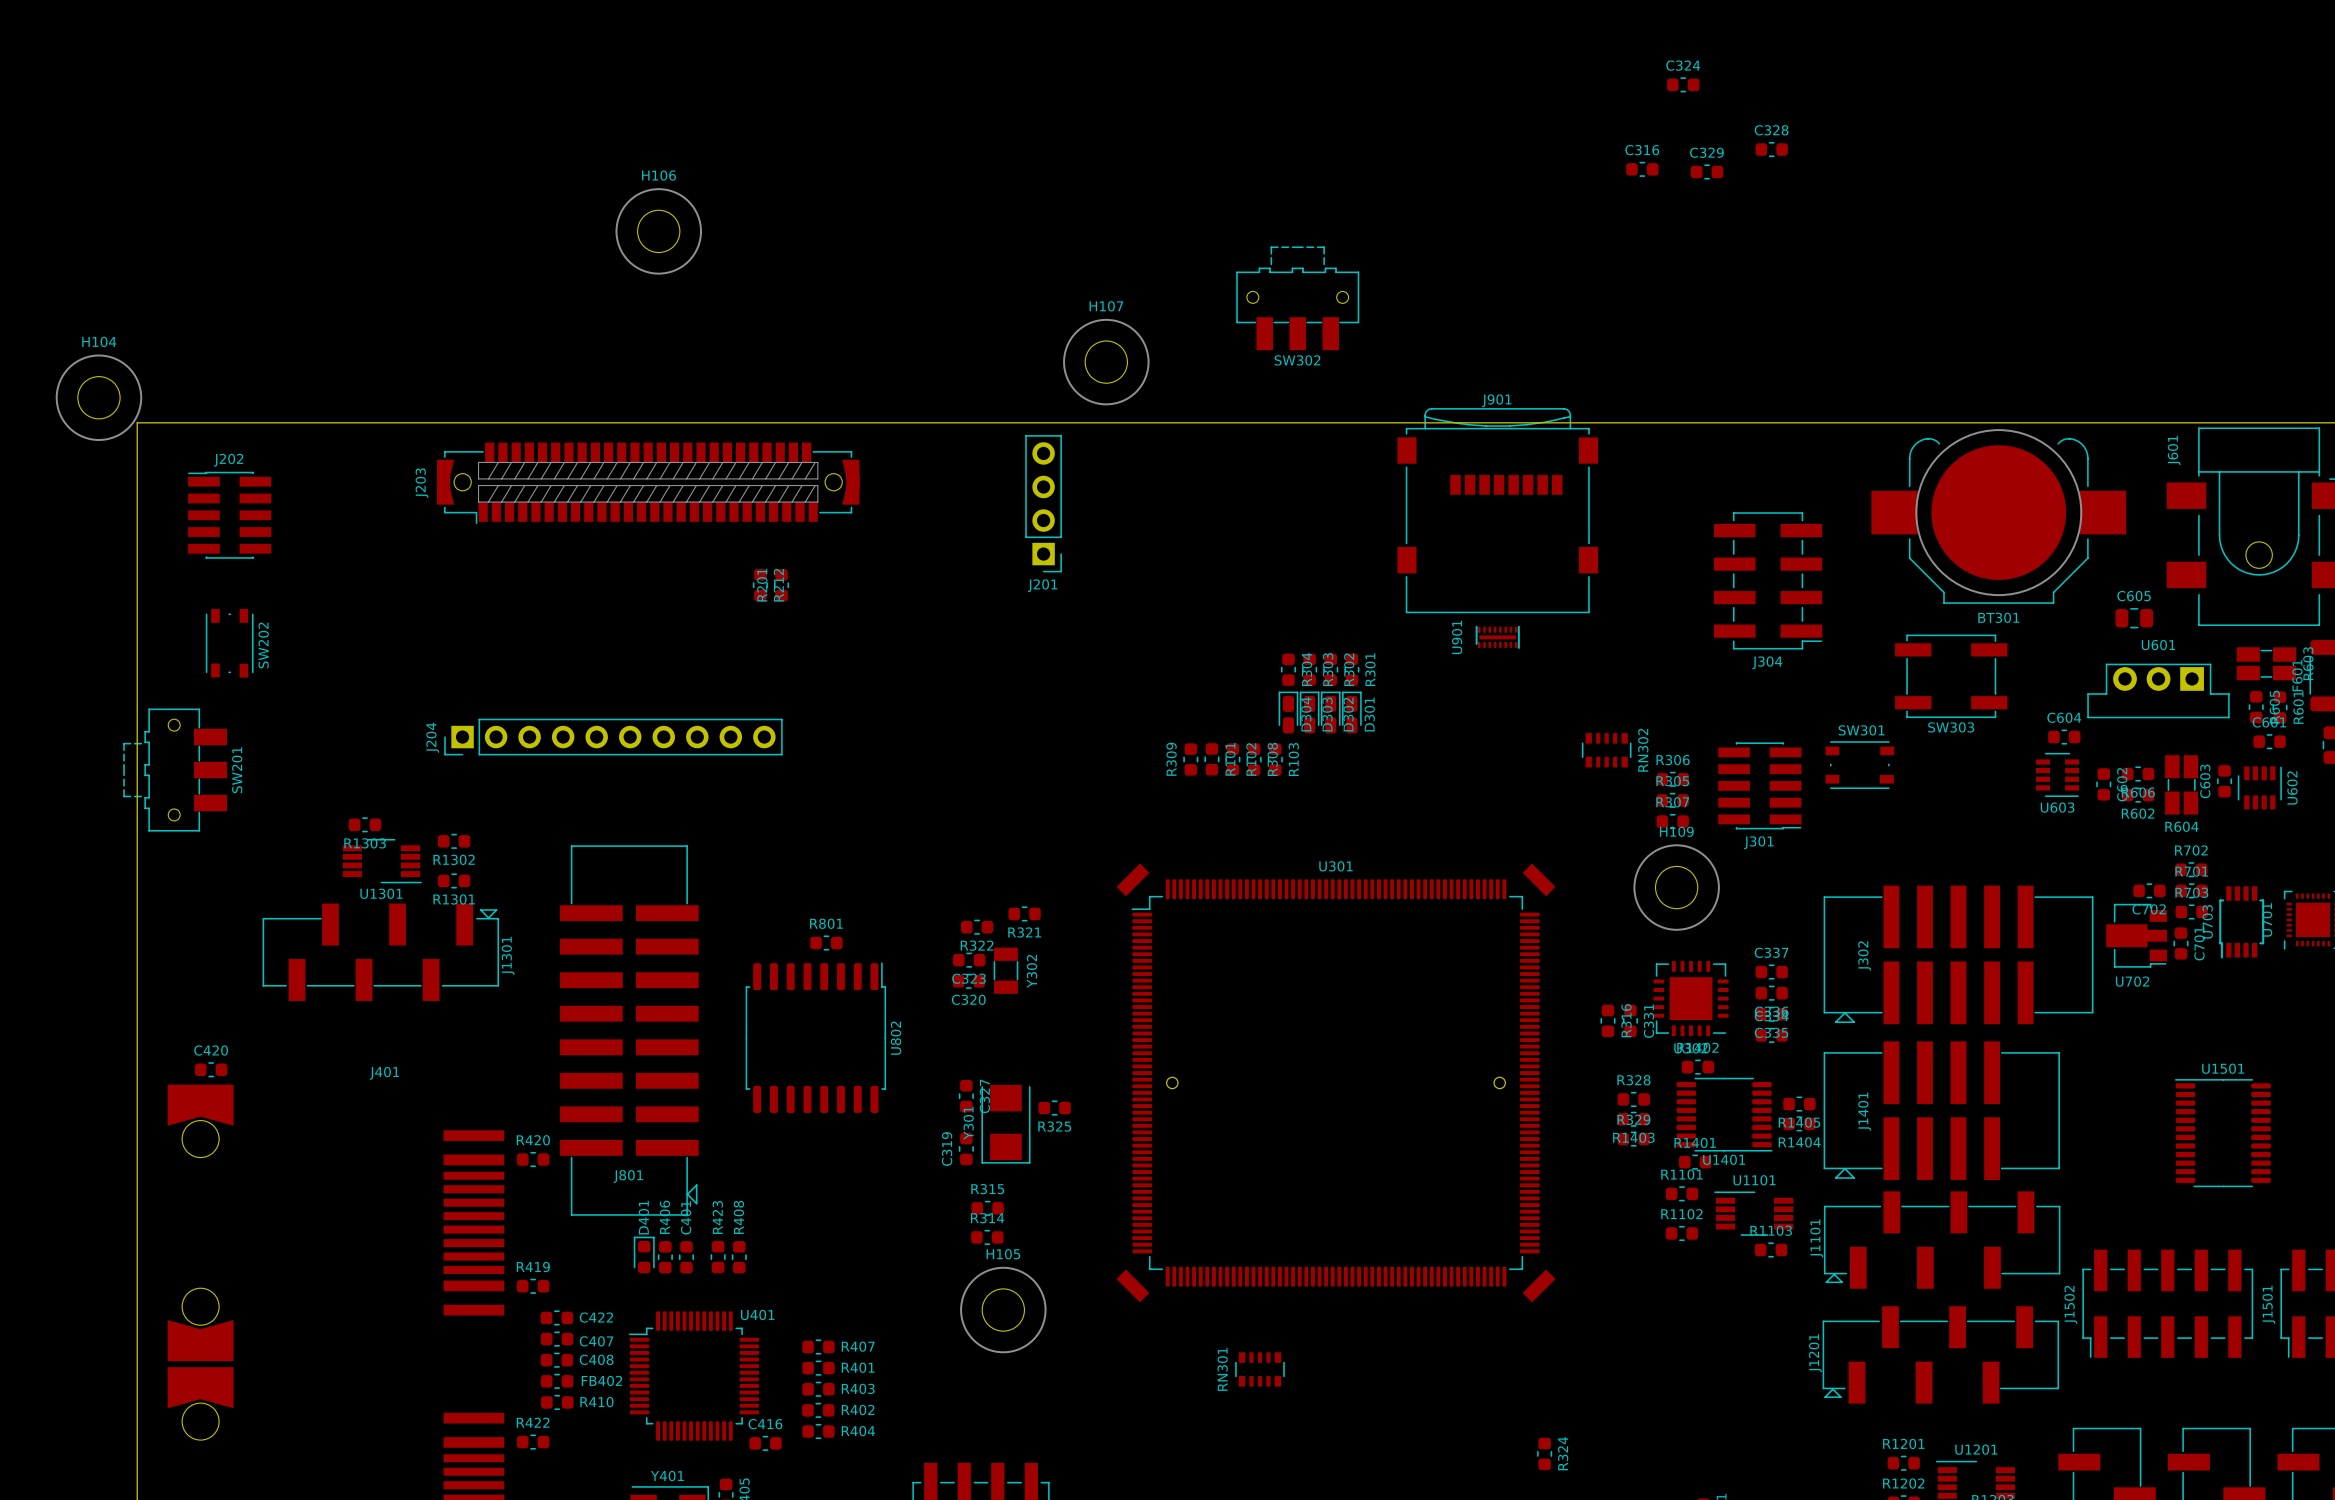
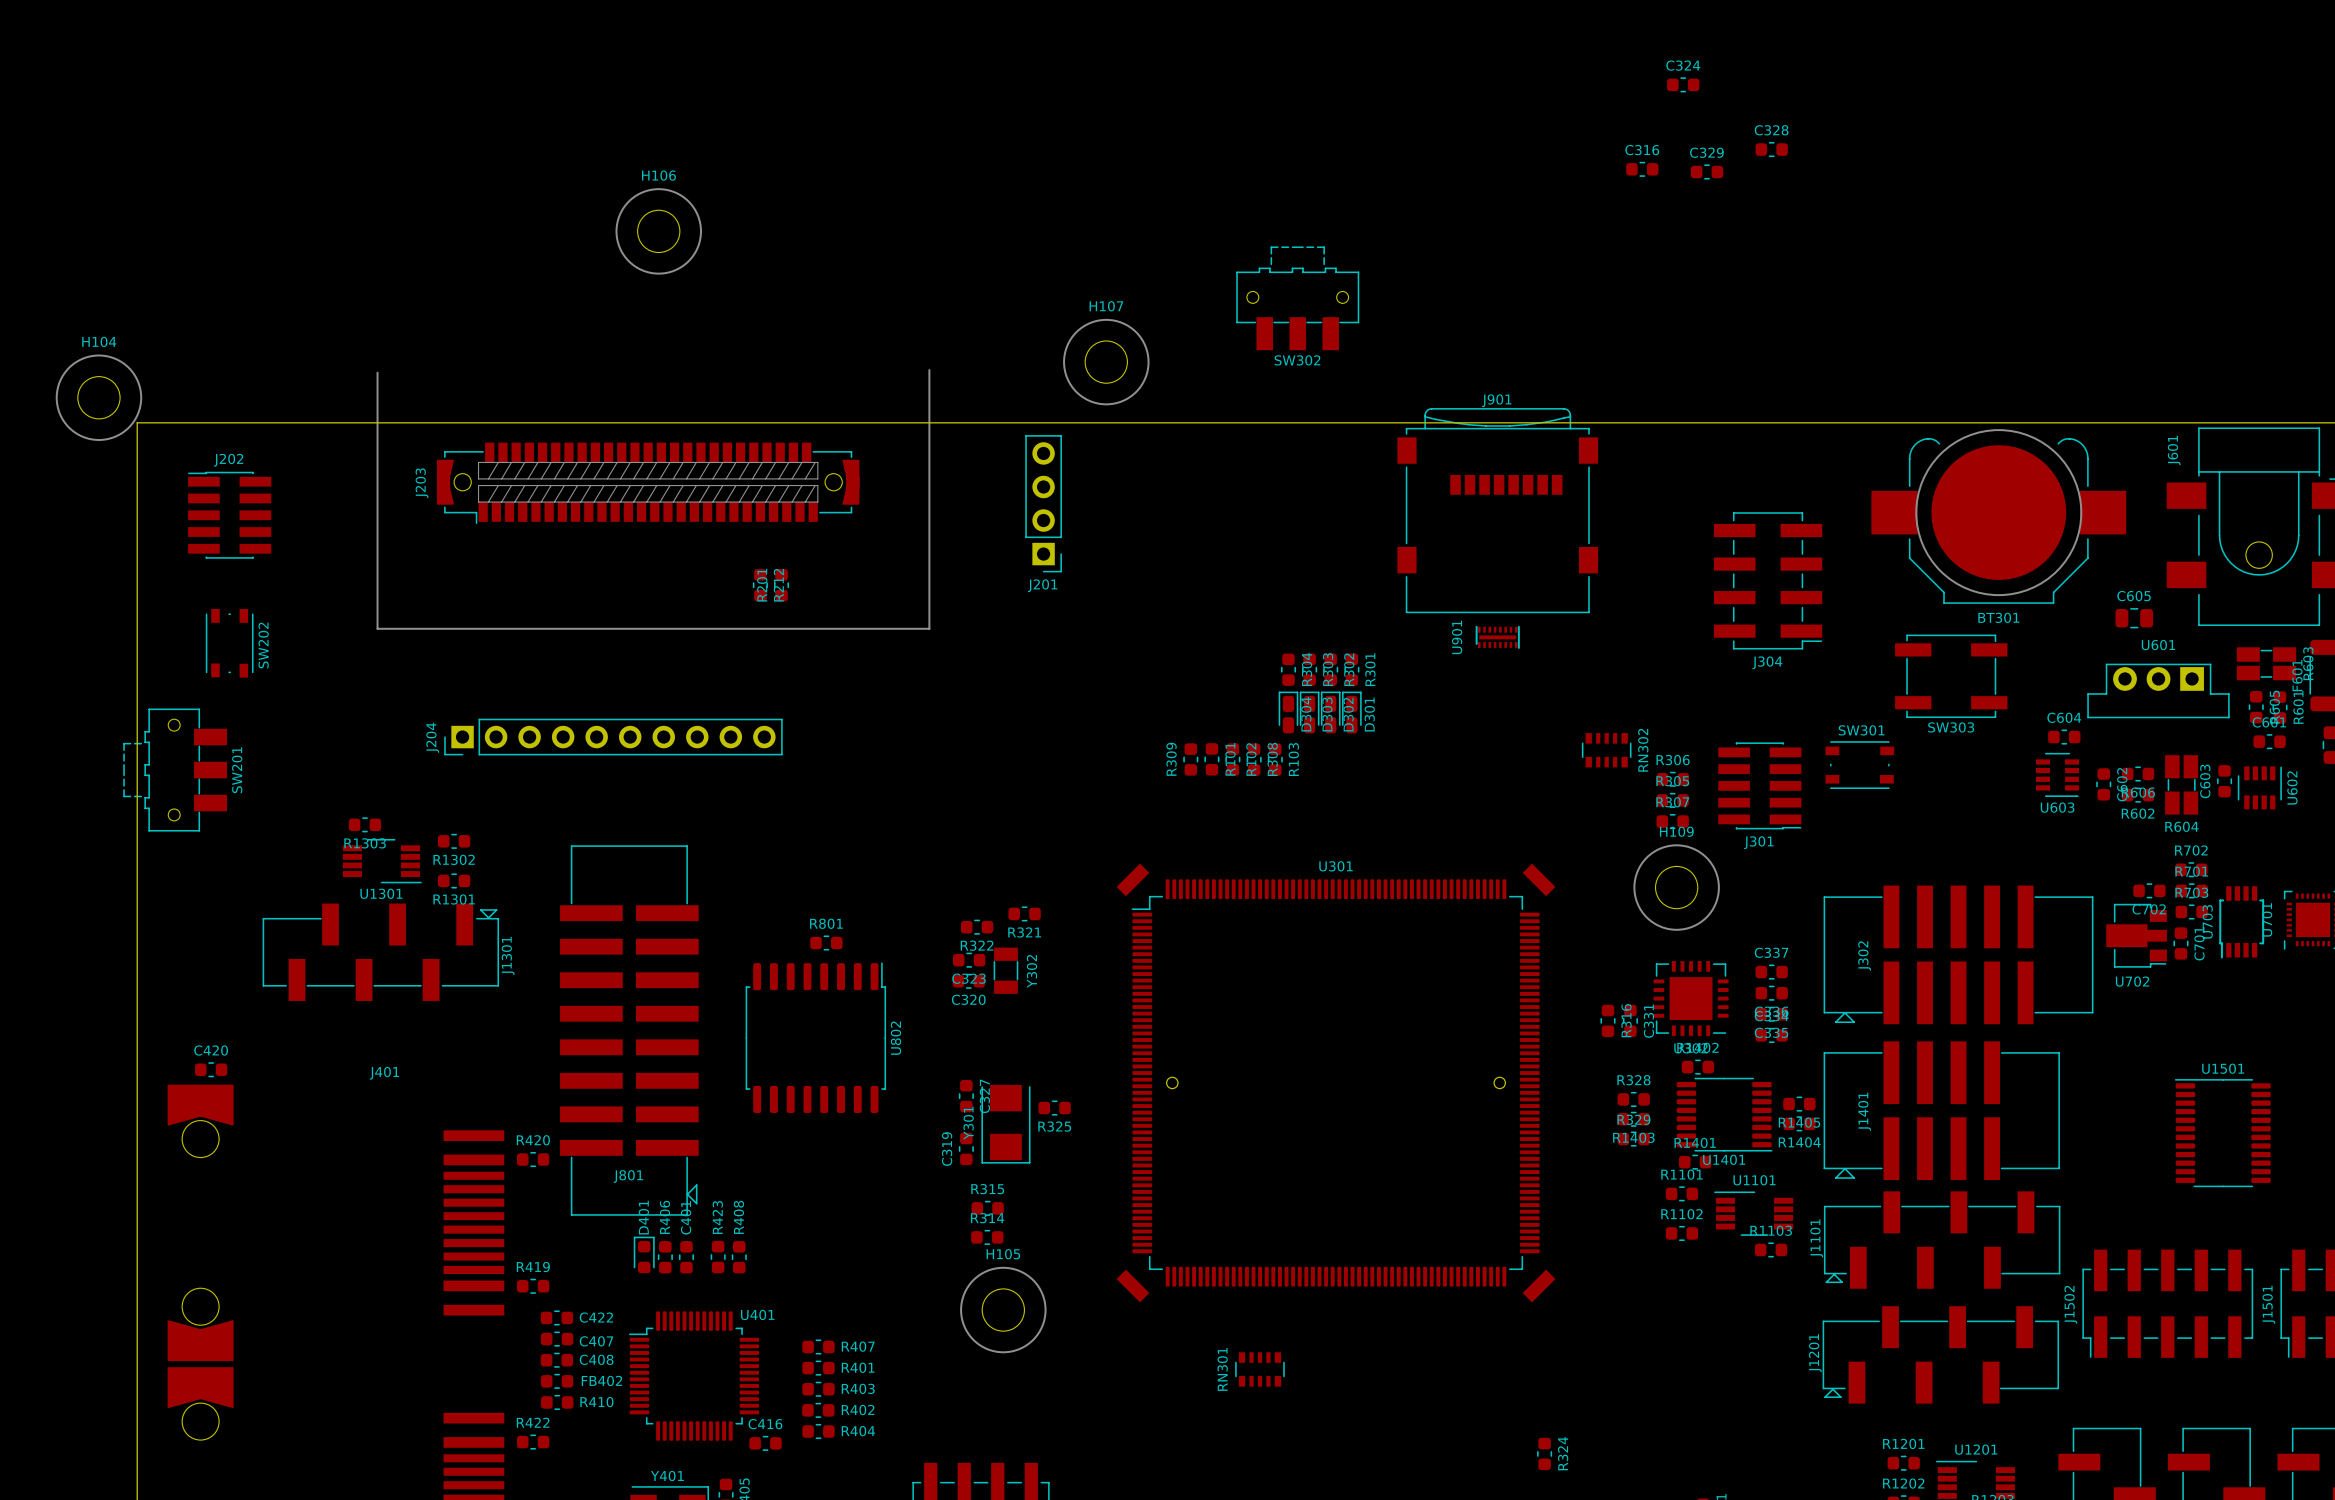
line: none -> (929, 370) (929, 628) (377, 628) (377, 372)

